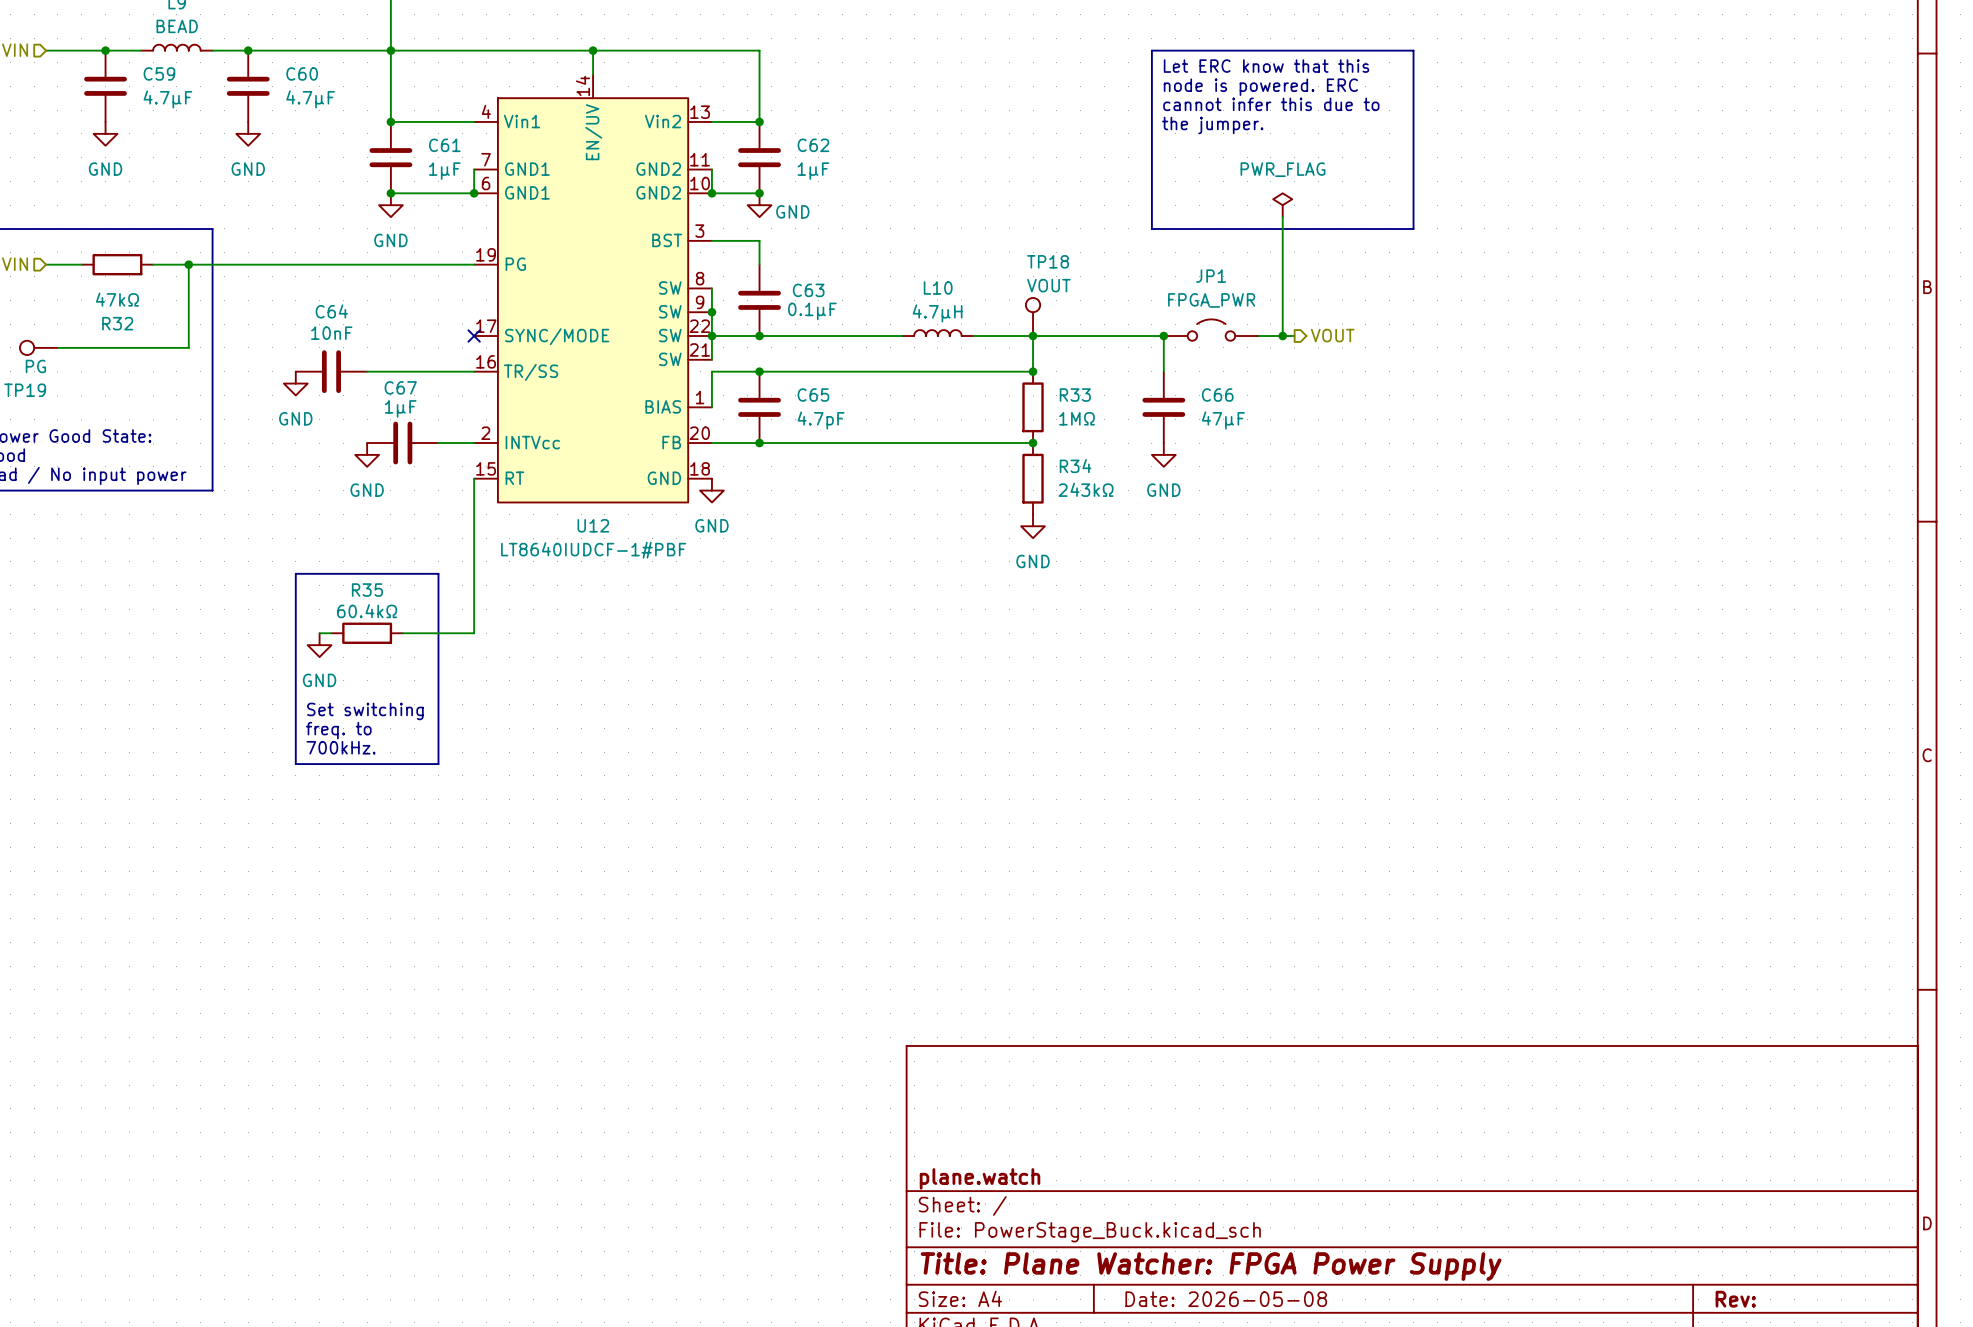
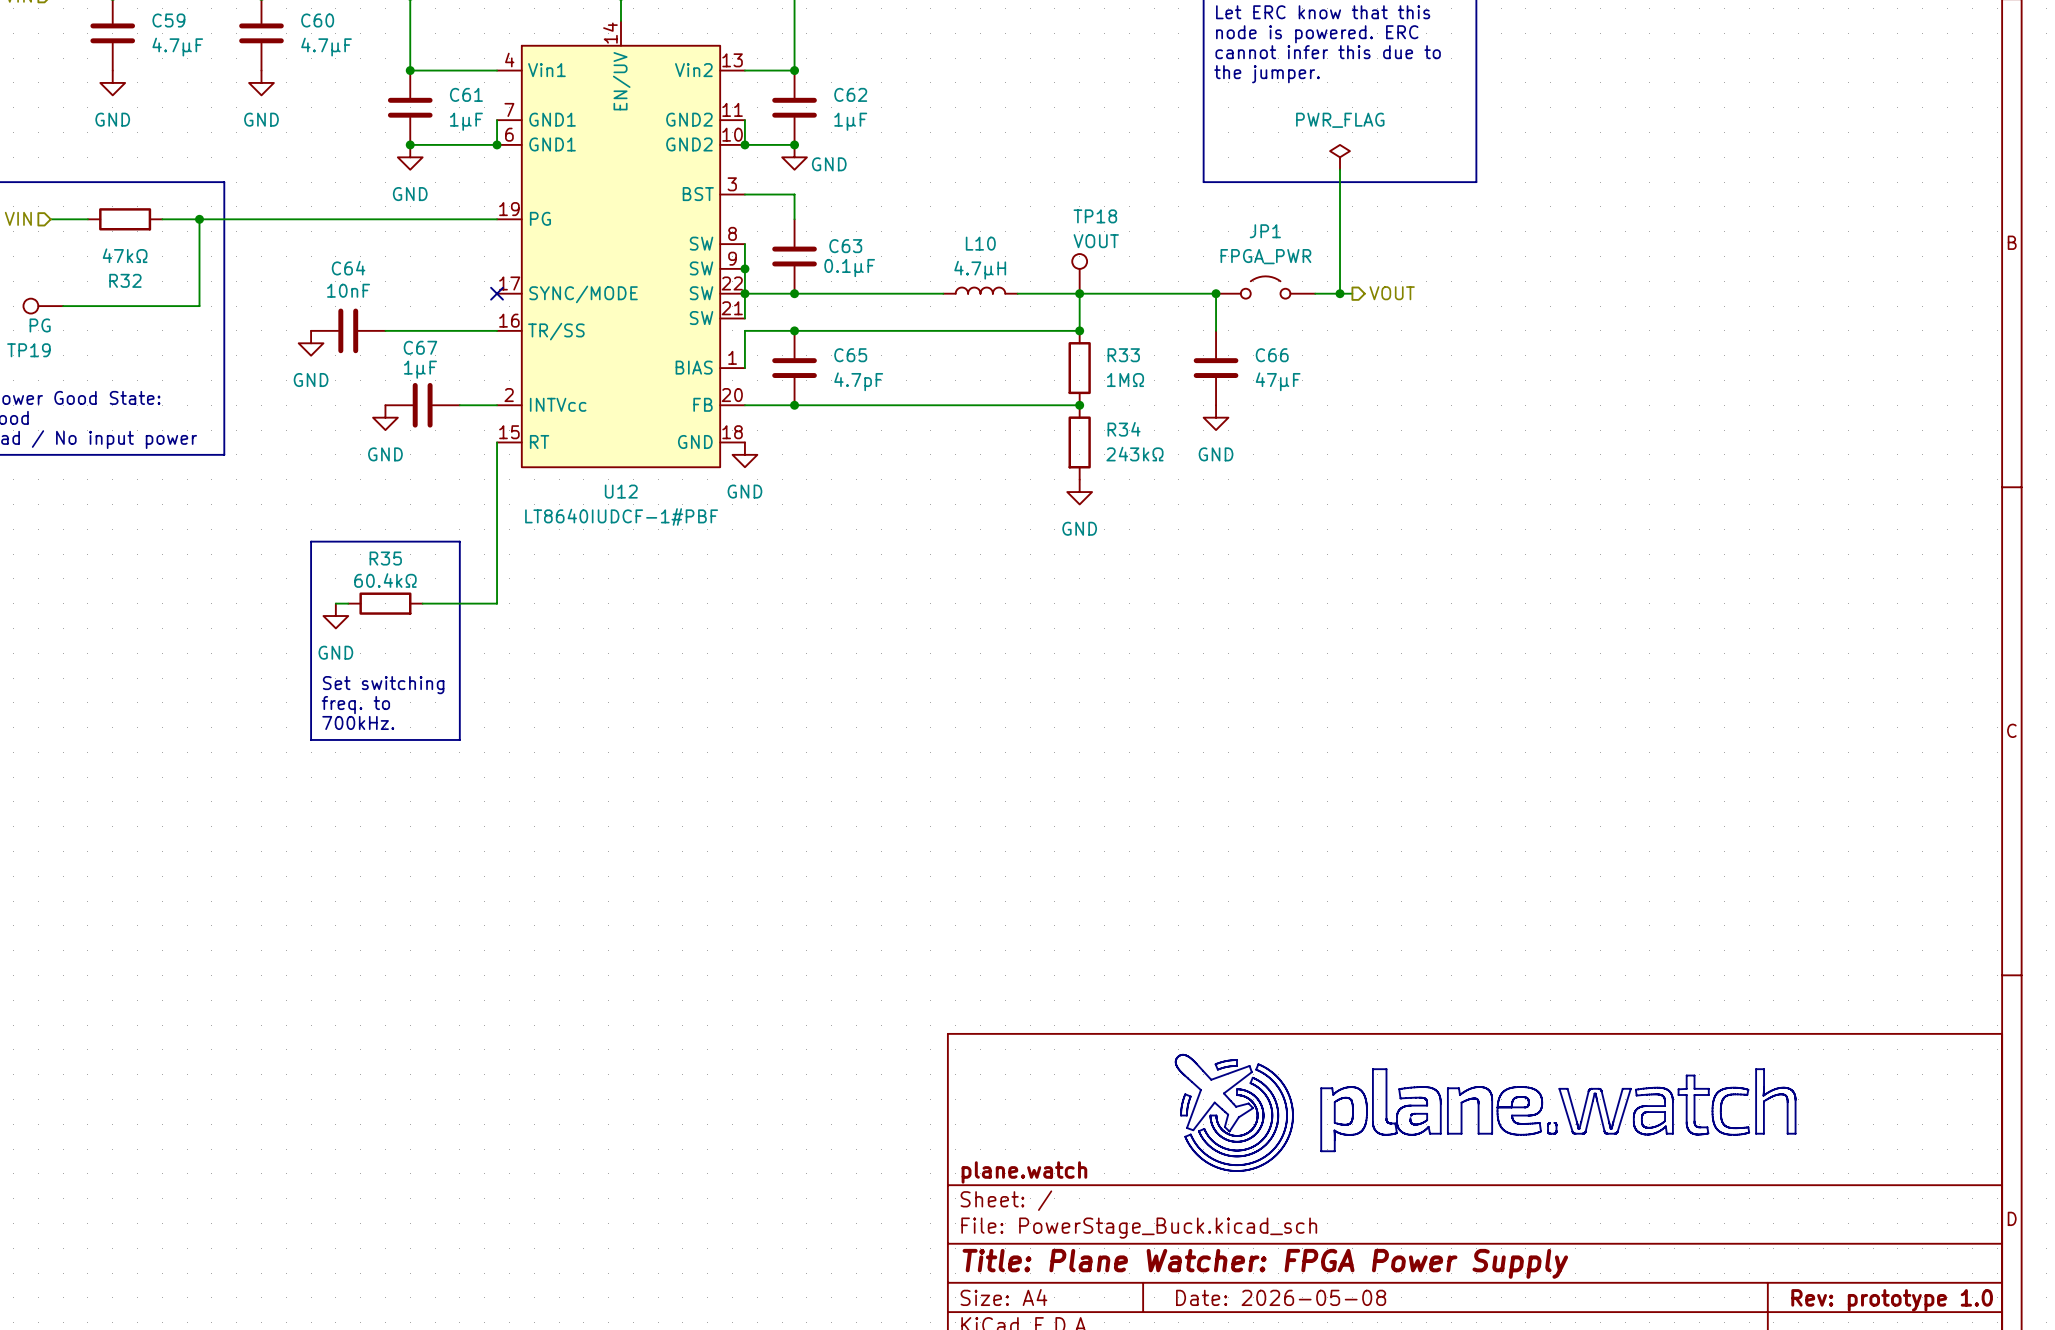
line: none -> (1182, 1054) (1176, 1059) (1176, 1066) (1200, 1090) (1187, 1128) (1193, 1130) (1214, 1102) (1228, 1114) (1224, 1127) (1229, 1131) (1238, 1117) (1253, 1108) (1248, 1103) (1236, 1106) (1223, 1093) (1251, 1072) (1249, 1065) (1211, 1079) (1192, 1059) (1182, 1054)
line: none -> (1235, 1060) (1224, 1061) (1215, 1064) (1217, 1069) (1237, 1065) (1235, 1060)
line: none -> (1258, 1064) (1256, 1069) (1273, 1081) (1284, 1099) (1287, 1117) (1282, 1135) (1274, 1147) (1264, 1156) (1251, 1163) (1237, 1165) (1224, 1163) (1212, 1158) (1199, 1148) (1190, 1134) (1185, 1136) (1197, 1154) (1214, 1166) (1235, 1171) (1257, 1167) (1275, 1155) (1288, 1137) (1292, 1115) (1288, 1094) (1276, 1076) (1258, 1064)
line: none -> (1372, 1069) (1386, 1069) (1386, 1119) (1388, 1123) (1395, 1123) (1395, 1133) (1381, 1134) (1373, 1127) (1372, 1069)
line: none -> (1756, 1069) (1756, 1133) (1763, 1133) (1763, 1101) (1781, 1094) (1785, 1095) (1787, 1099) (1787, 1133) (1795, 1133) (1793, 1092) (1788, 1088) (1780, 1087) (1763, 1095) (1764, 1069) (1756, 1069)
line: none -> (1686, 1075) (1686, 1088) (1678, 1089) (1678, 1094) (1686, 1094) (1687, 1128) (1694, 1134) (1708, 1133) (1707, 1127) (1698, 1127) (1694, 1124) (1694, 1095) (1708, 1095) (1708, 1088) (1694, 1088) (1694, 1075) (1686, 1075)
line: none -> (1252, 1077) (1250, 1083) (1262, 1091) (1270, 1104) (1272, 1117) (1269, 1129) (1256, 1144) (1237, 1150) (1227, 1149) (1217, 1144) (1209, 1137) (1204, 1128) (1198, 1131) (1207, 1144) (1220, 1152) (1235, 1156) (1251, 1153) (1265, 1145) (1274, 1132) (1278, 1116) (1275, 1100) (1266, 1087) (1252, 1077)
line: none -> (1420, 1087) (1399, 1089) (1400, 1098) (1423, 1098) (1426, 1100) (1427, 1105) (1408, 1105) (1401, 1108) (1397, 1115) (1398, 1127) (1402, 1132) (1408, 1134) (1419, 1133) (1428, 1126) (1430, 1133) (1440, 1133) (1439, 1094) (1433, 1088) (1420, 1087)
line: none -> (1478, 1087) (1469, 1089) (1459, 1094) (1458, 1088) (1447, 1088) (1447, 1133) (1461, 1133) (1461, 1102) (1474, 1098) (1478, 1101) (1478, 1133) (1492, 1133) (1491, 1094) (1487, 1088) (1478, 1087)
line: none -> (1350, 1087) (1341, 1089) (1333, 1094) (1332, 1088) (1321, 1088) (1321, 1151) (1334, 1151) (1334, 1130) (1343, 1134) (1353, 1134) (1360, 1132) (1364, 1126) (1367, 1111) (1365, 1096) (1359, 1089) (1350, 1087)
line: none -> (1657, 1087) (1635, 1089) (1636, 1095) (1659, 1094) (1664, 1099) (1665, 1106) (1643, 1106) (1635, 1110) (1634, 1126) (1641, 1133) (1654, 1133) (1665, 1126) (1666, 1133) (1672, 1133) (1671, 1095) (1666, 1089) (1657, 1087)
line: none -> (1733, 1087) (1722, 1089) (1715, 1096) (1712, 1108) (1714, 1124) (1718, 1130) (1726, 1134) (1749, 1132) (1748, 1127) (1729, 1127) (1721, 1121) (1720, 1106) (1724, 1097) (1731, 1094) (1747, 1094) (1748, 1089) (1733, 1087)
line: none -> (1591, 1088) (1598, 1088)
line: none -> (1237, 1089) (1237, 1095) (1248, 1098) (1256, 1108) (1257, 1119) (1251, 1129) (1241, 1135) (1230, 1134) (1220, 1127) (1216, 1115) (1210, 1115) (1212, 1125) (1218, 1134) (1226, 1139) (1237, 1141) (1247, 1139) (1255, 1134) (1261, 1125) (1263, 1115) (1261, 1105) (1255, 1096) (1247, 1091) (1237, 1089)
line: none -> (1601, 1090) (1611, 1128) (1622, 1088) (1630, 1088) (1617, 1131)
line: none -> (1588, 1091) (1578, 1128) (1567, 1088) (1559, 1088) (1572, 1131)
line: none -> (1185, 1094) (1182, 1104) (1181, 1115) (1186, 1115) (1190, 1096) (1185, 1094)
line: none -> (1345, 1097) (1349, 1098) (1352, 1102) (1351, 1121) (1347, 1124) (1334, 1122) (1334, 1102) (1345, 1097)
line: none -> (1497, 1107) (1499, 1122) (1506, 1131) (1521, 1134) (1541, 1131) (1539, 1122) (1517, 1123) (1513, 1121) (1512, 1116) (1532, 1115) (1539, 1111) (1541, 1099) (1535, 1089) (1520, 1086) (1506, 1089) (1500, 1095) (1497, 1107)
line: none -> (1497, 1107) (1524, 1107) (1526, 1107) (1528, 1104) (1528, 1099) (1524, 1097) (1515, 1097) (1512, 1100) (1512, 1103) (1511, 1104) (1511, 1105) (1511, 1107)
line: none -> (1646, 1112) (1665, 1112) (1665, 1121) (1654, 1126) (1644, 1127) (1642, 1123) (1641, 1116) (1646, 1112)
line: none -> (1411, 1114) (1427, 1113) (1427, 1120) (1414, 1124) (1411, 1122) (1410, 1118)
line: none -> (1548, 1125) (1548, 1131)
line: none -> (1556, 1125) (1556, 1131)
line: none -> (1585, 1131) (1594, 1093) (1604, 1131)
line: none -> (1573, 1132) (1582, 1133)
line: none -> (1550, 1133) (1554, 1133)
line: none -> (1607, 1133) (1614, 1133)
title block: Rev: (1735, 1299) -> Rev: prototype 1.0 (1892, 1300)

